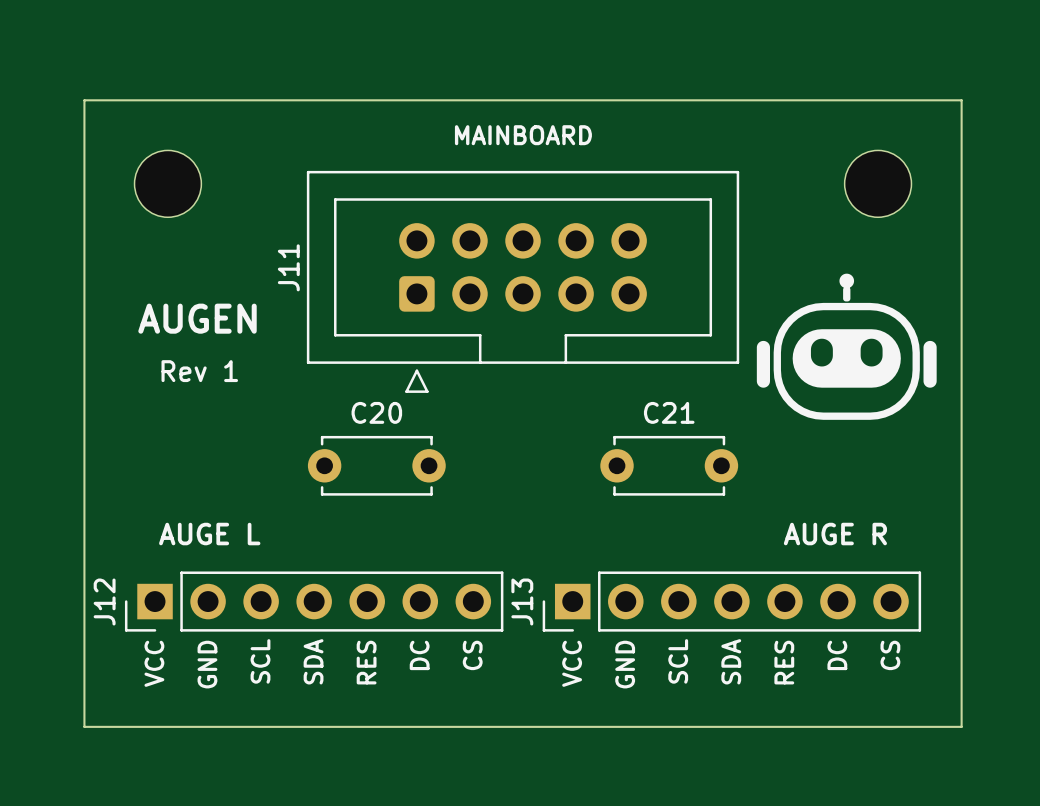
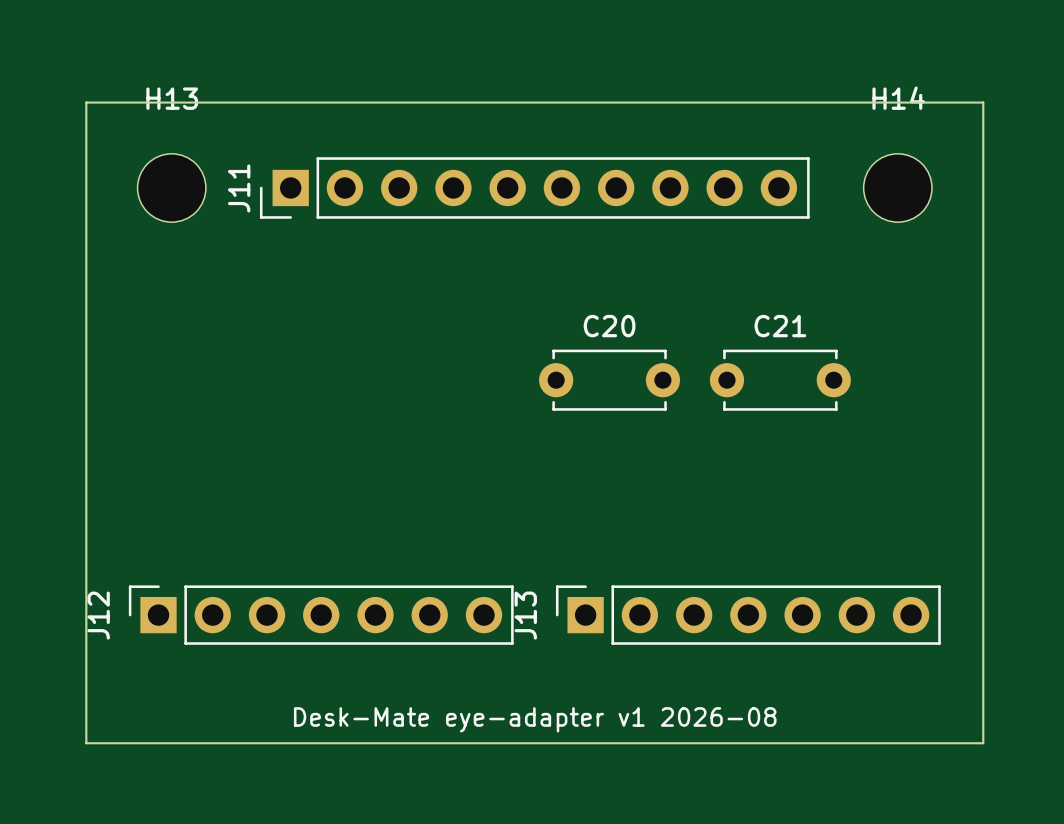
H13 name: none -> H13 (172, 98)
H14 name: none -> H14 (898, 98)
text: MAINBOARD (523, 135) -> none
J11 footprint: [306, 170, 740, 393] -> [259, 157, 810, 219]
J11 name position: J11 (288, 267) -> J11 (239, 188)
drawing: [756, 273, 937, 420] -> none
text: AUGEN (197, 318) -> none
text: Rev 1 (199, 371) -> none
C20 position: (376, 465) -> (609, 380)
C21 position: (669, 465) -> (780, 380)
text: AUGE L (209, 534) -> none
text: AUGE R (835, 534) -> none
J12 footprint: [124, 571, 504, 632] -> [128, 585, 514, 645]
J13 footprint: [542, 571, 922, 632] -> [555, 585, 941, 645]
text: DC (419, 655) -> none
text: CS (472, 655) -> none
text: DC (837, 655) -> none
text: CS (890, 655) -> none
text: SCL (260, 661) -> none
text: SDA (313, 661) -> none
text: SCL (678, 661) -> none
text: SDA (731, 661) -> none
text: RES (366, 662) -> none
text: RES (784, 662) -> none
text: VCC (154, 663) -> none
text: VCC (572, 663) -> none
text: GND (207, 664) -> none
text: GND (625, 664) -> none
text: none -> Desk-Mate eye-adapter v1 2026-08 (535, 719)

